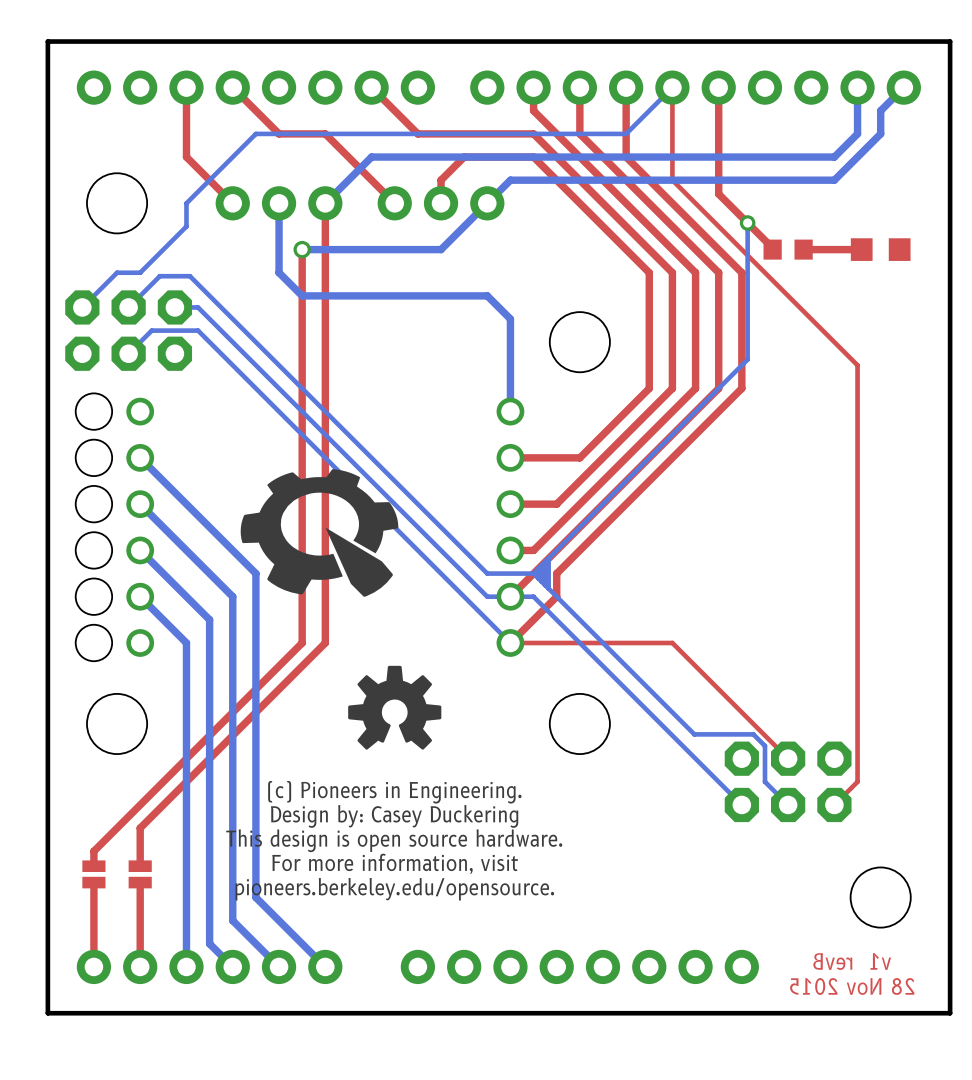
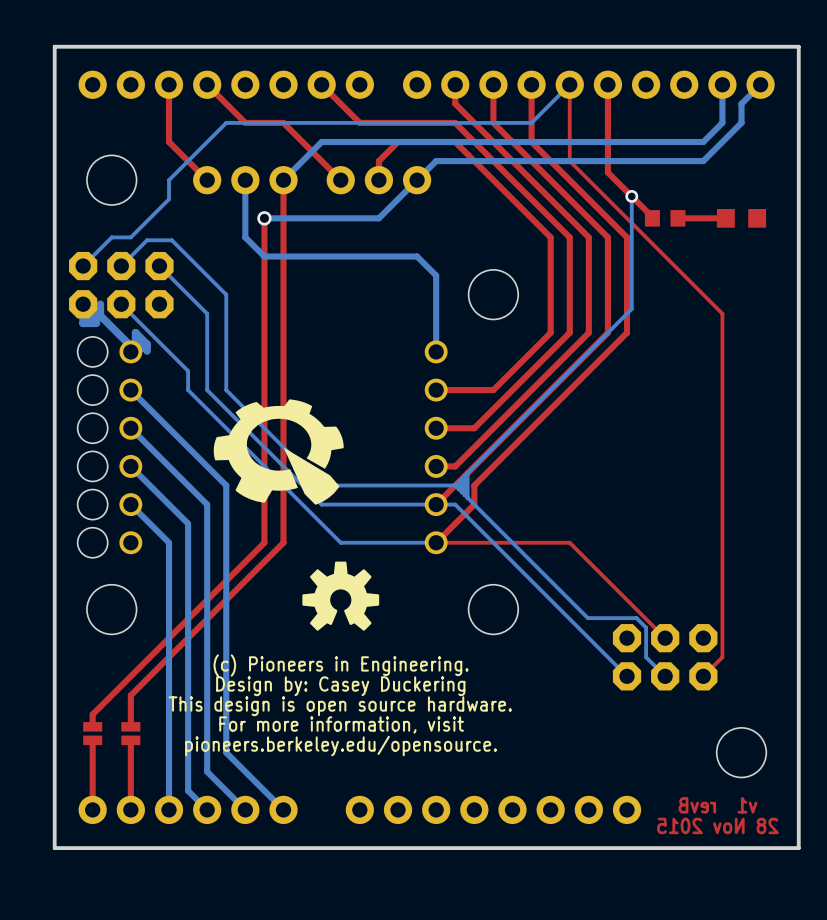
bottom track: (174, 307) (198, 307) (487, 596) -> none
bottom track: (198, 330) (151, 330) (128, 353) -> (178, 285) (159, 266)
bottom track: (255, 342) (487, 573) -> (226, 294) (226, 390) (321, 485) (417, 485)
bottom track: none -> (83, 304) (88, 304) (130, 346) (130, 351)
bottom track: none -> (100, 304) (100, 317)
bottom track: none -> (121, 304) (188, 371) (188, 390) (340, 542) (436, 542)
bottom track: none -> (86, 309) (94, 317) (83, 317) (83, 323) (96, 323)
bottom track: (232, 365) (510, 642) -> (207, 313) (207, 390) (321, 504) (417, 504)
bottom track: none -> (138, 341) (145, 348) (135, 348) (135, 332) (147, 344) (147, 350)

